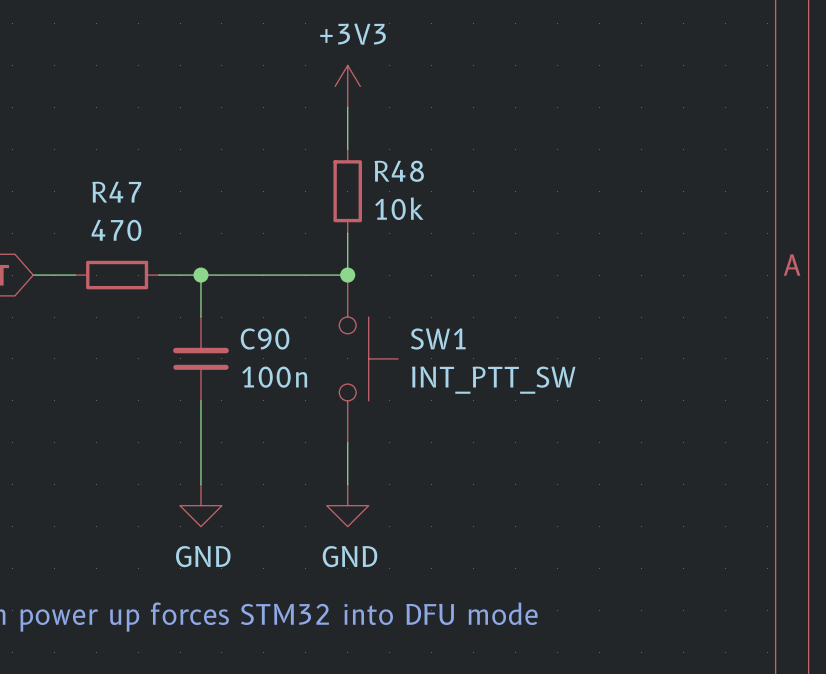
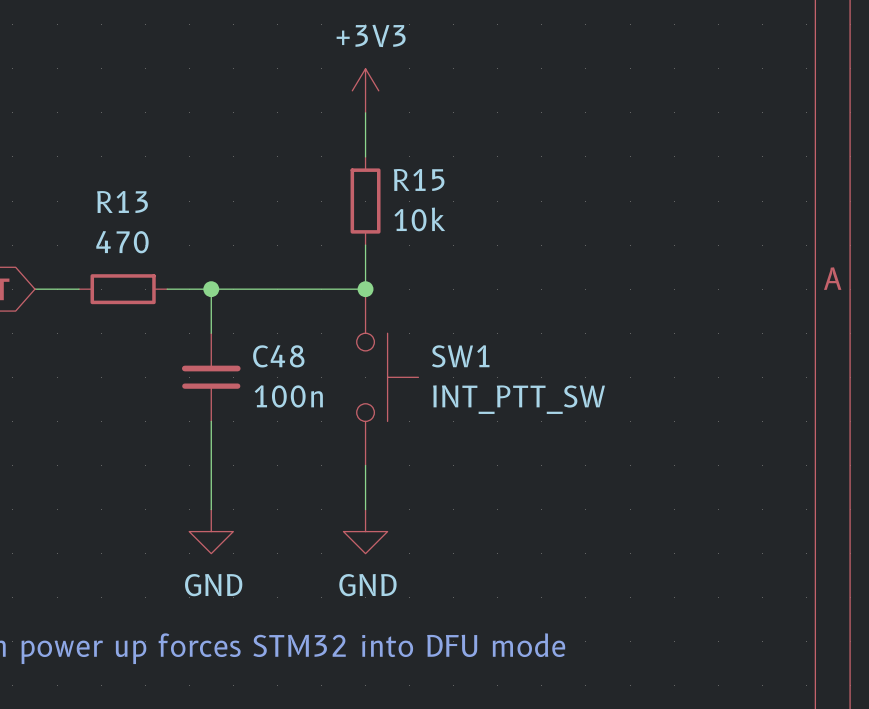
R48 name: R48 (399, 171) -> R15 (419, 179)
R47 name: R47 (116, 192) -> R13 (122, 201)
C90 name: C90 (265, 339) -> C48 (278, 356)

